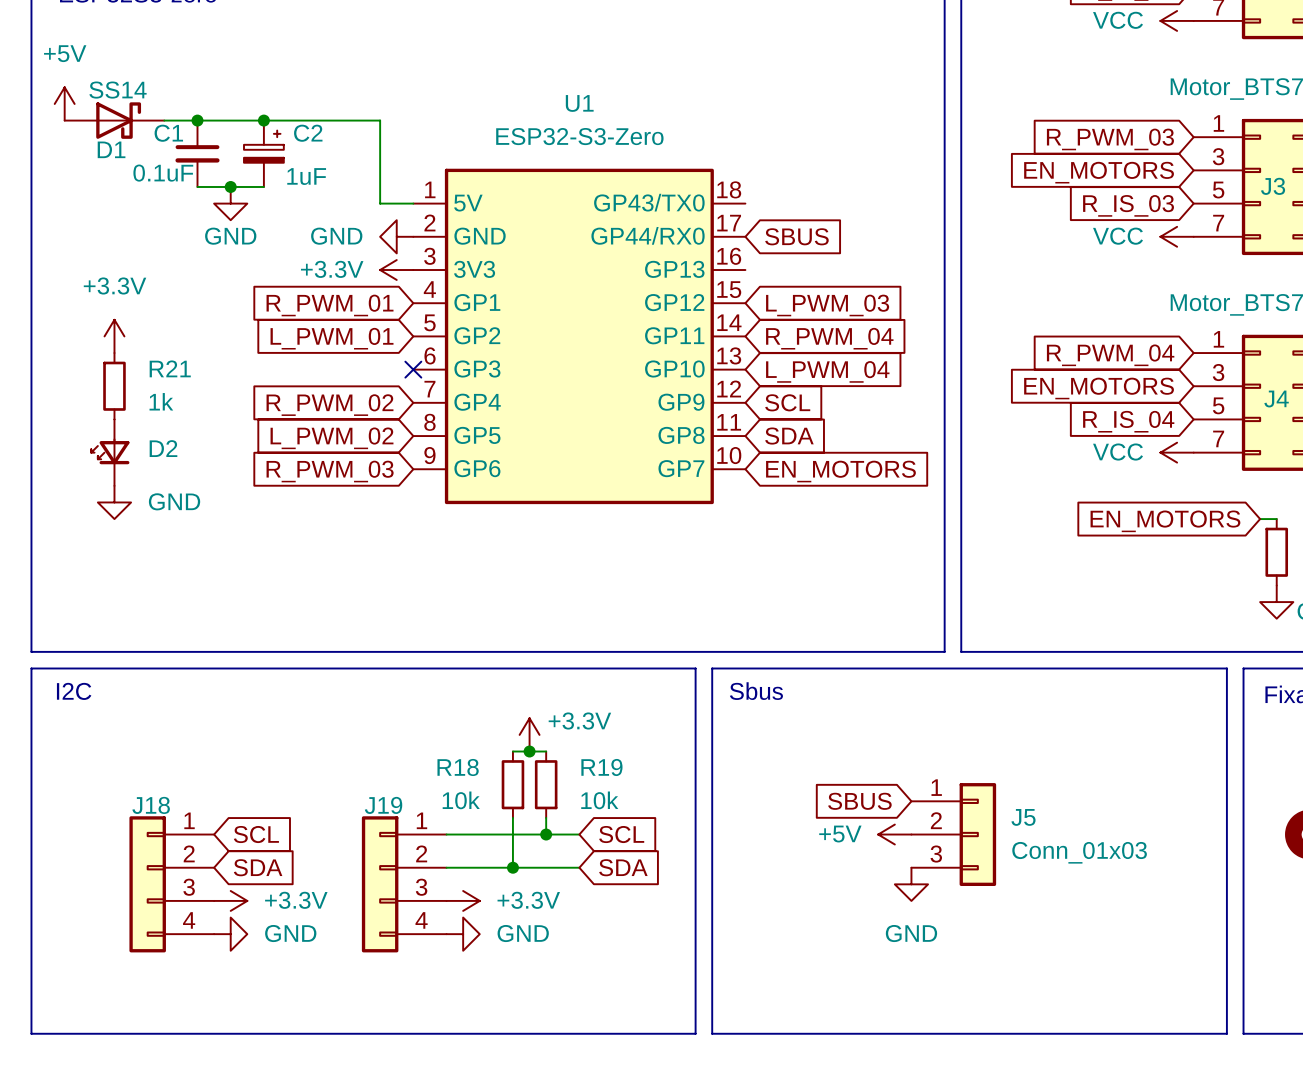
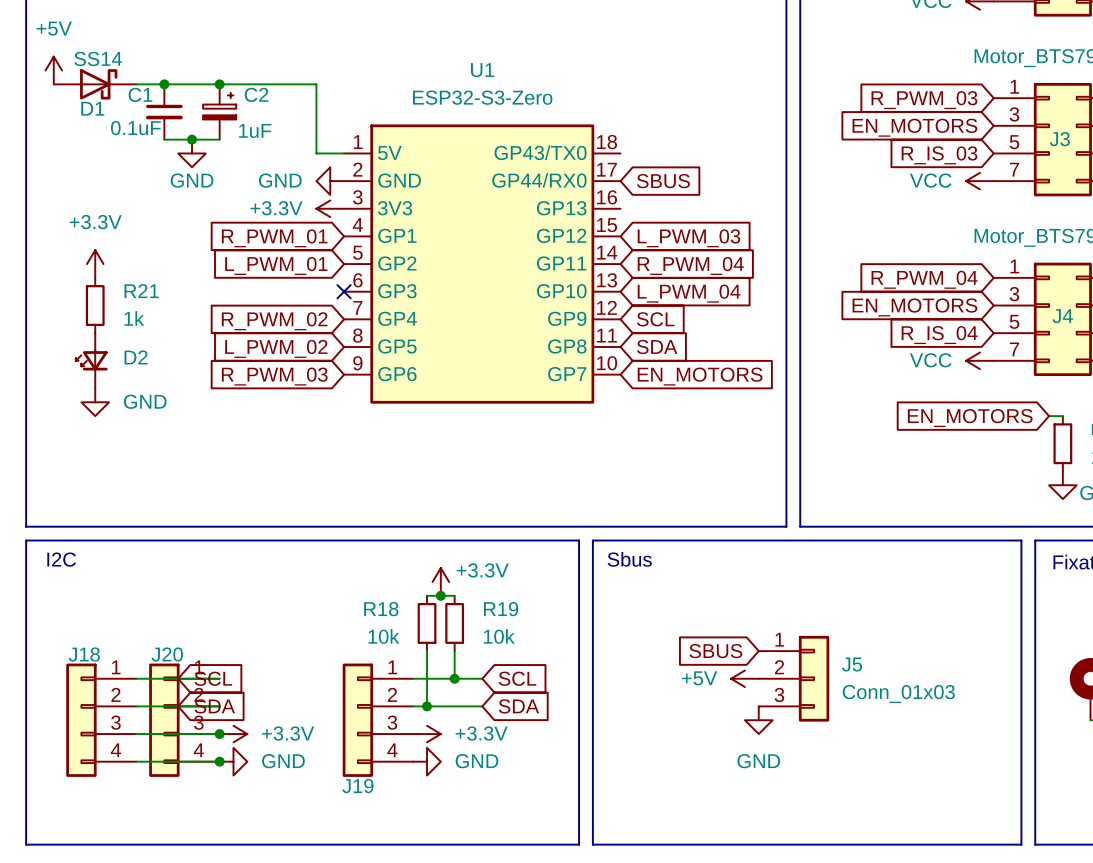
power symbol position: +3.3V (529, 734) -> +3.3V (440, 581)
wire: (512, 751) (546, 751) -> (427, 595) (454, 595)
junction position: (529, 751) -> (440, 595)
R18 position: (512, 784) -> (427, 623)
R19 position: (546, 784) -> (454, 623)
J19 name position: J19 (383, 805) -> J19 (357, 786)
J18 position: (171, 884) -> (101, 720)
J20: none -> (184, 720)
J19 position: (404, 884) -> (377, 720)
power symbol position: +3.3V (230, 900) -> +3.3V (233, 734)
junction: none -> (219, 734)
power symbol position: +3.3V (463, 900) -> +3.3V (427, 734)
power symbol position: GND (230, 934) -> GND (233, 761)
junction: none -> (219, 761)
power symbol position: GND (463, 934) -> GND (427, 761)

